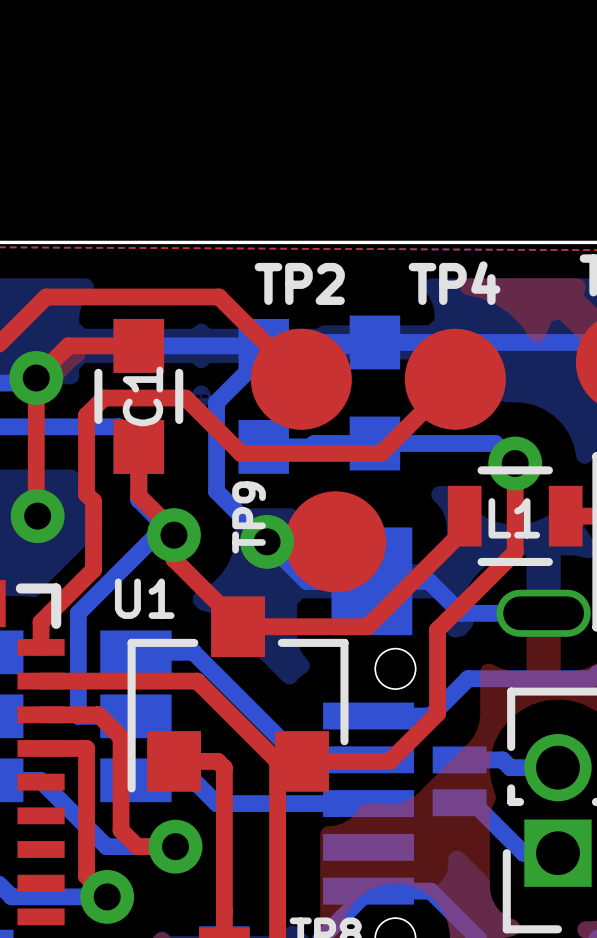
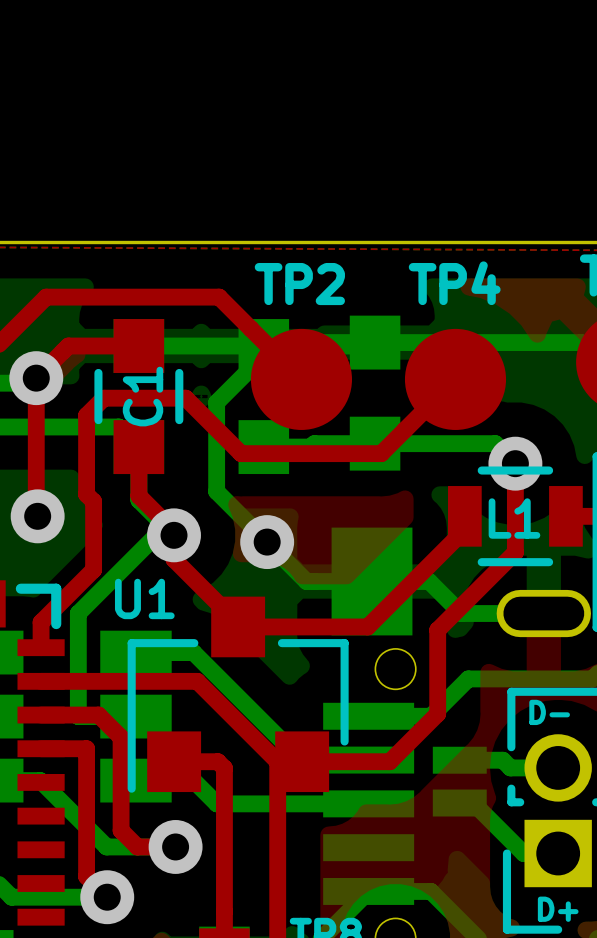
TP9: (335, 541) -> none
text: none -> D- (549, 712)
text: none -> D+ (558, 909)

